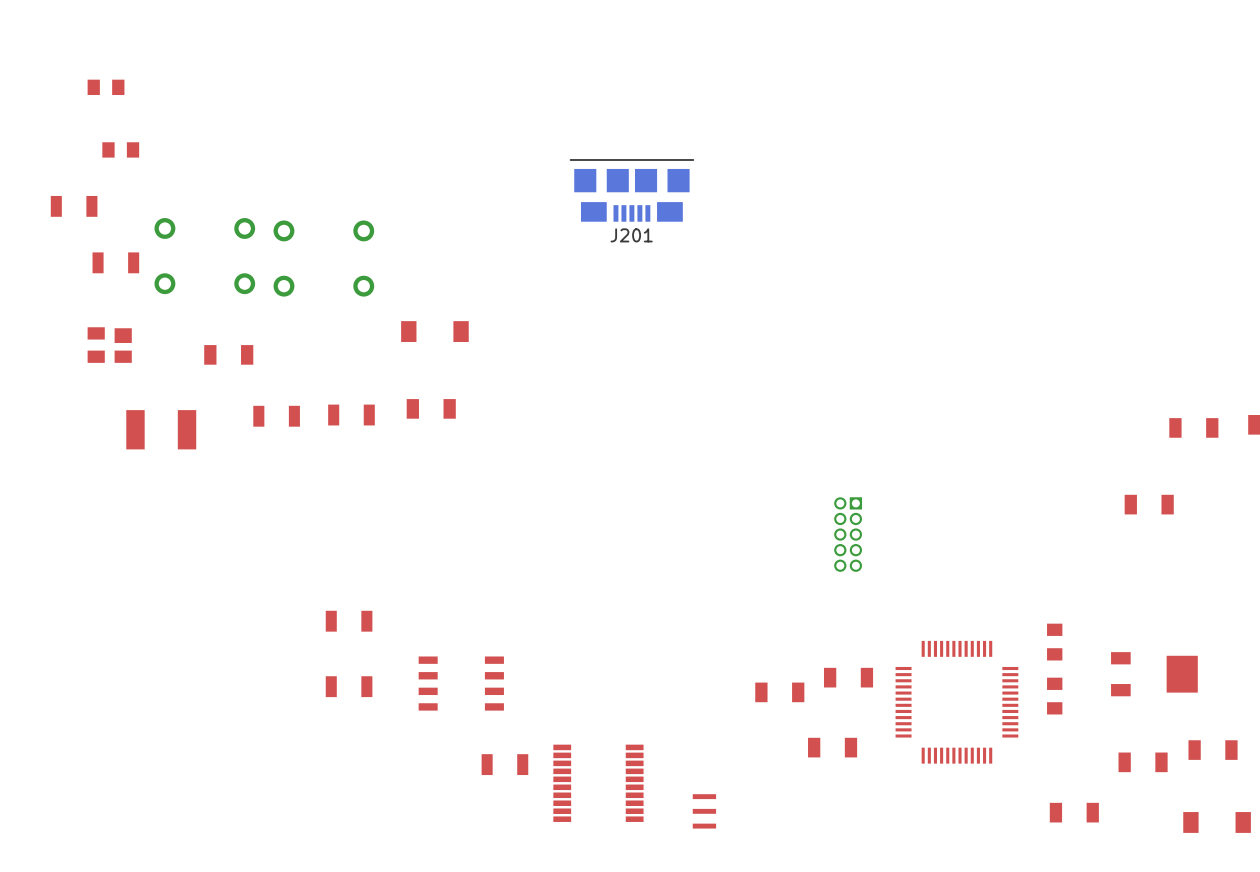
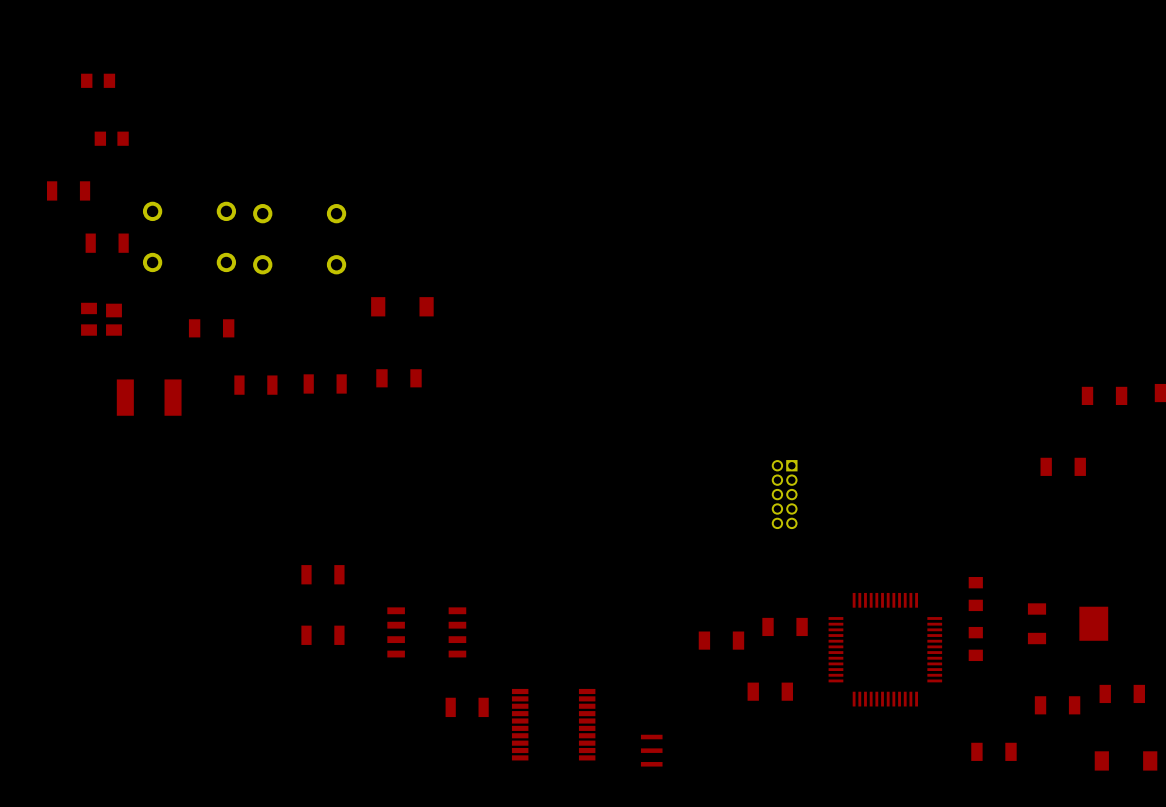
J201: (631, 190) -> none

